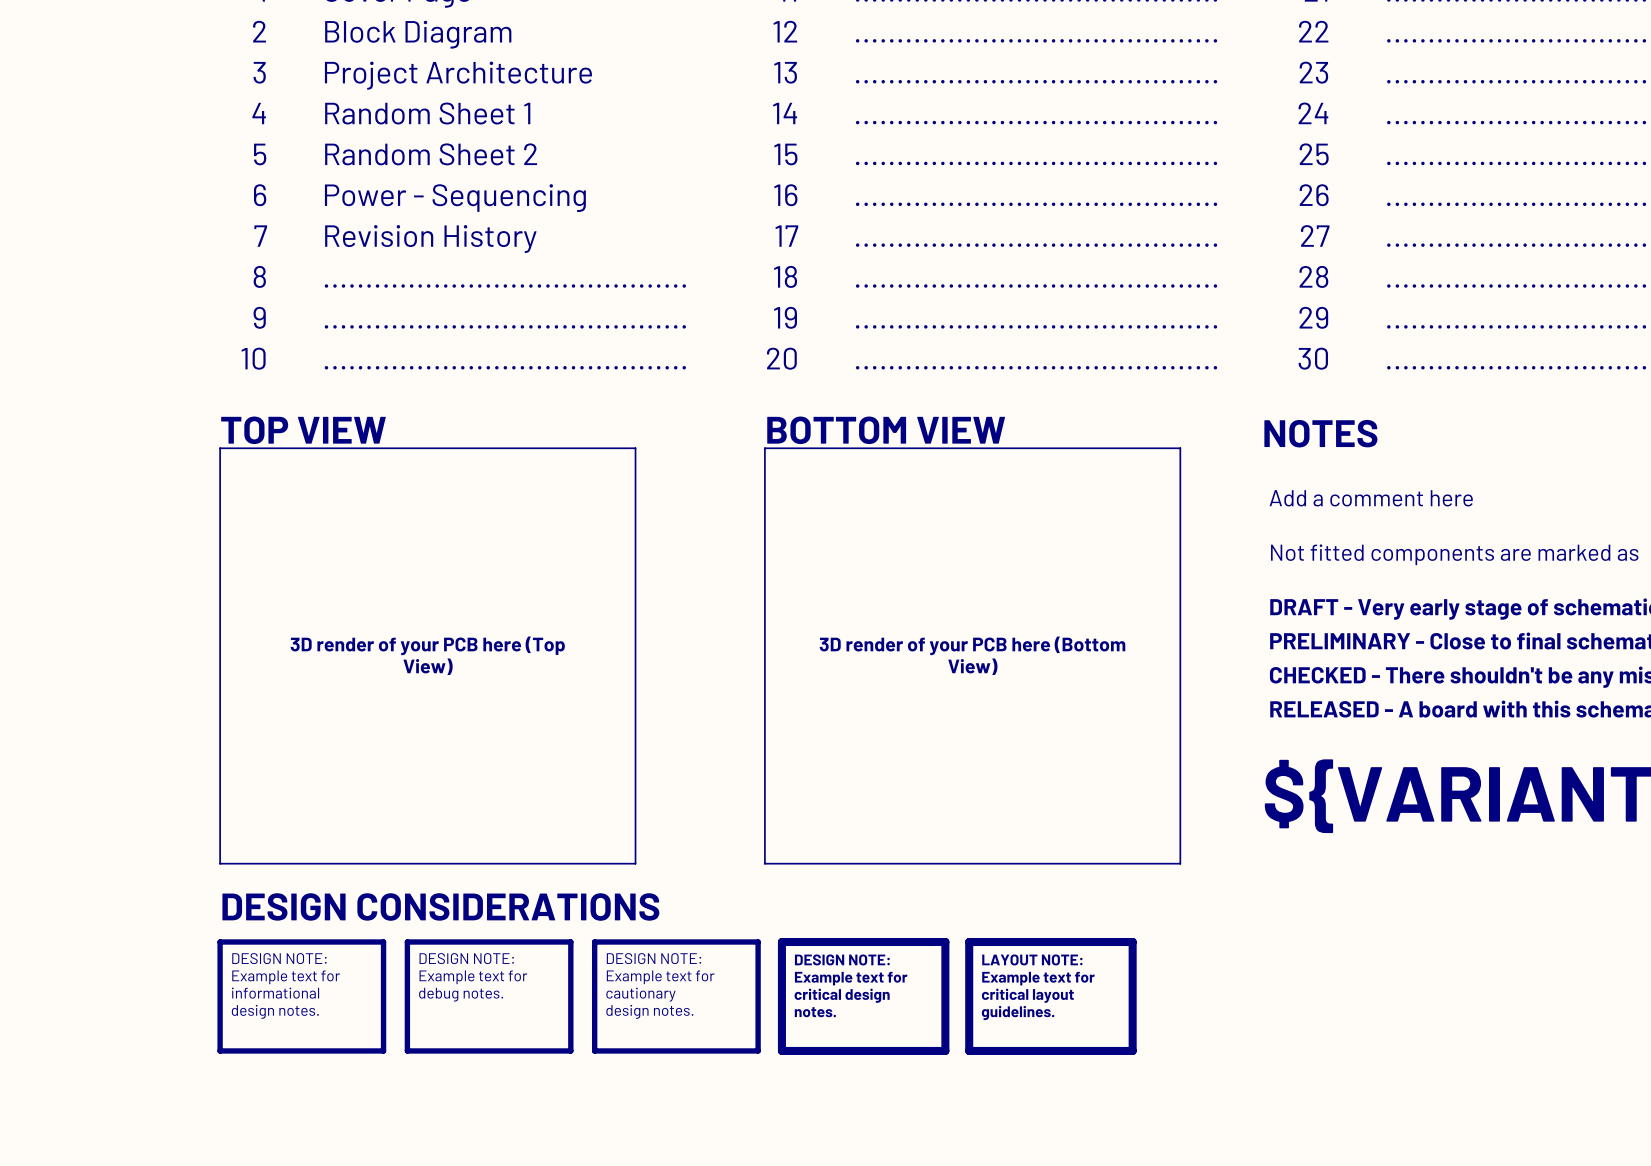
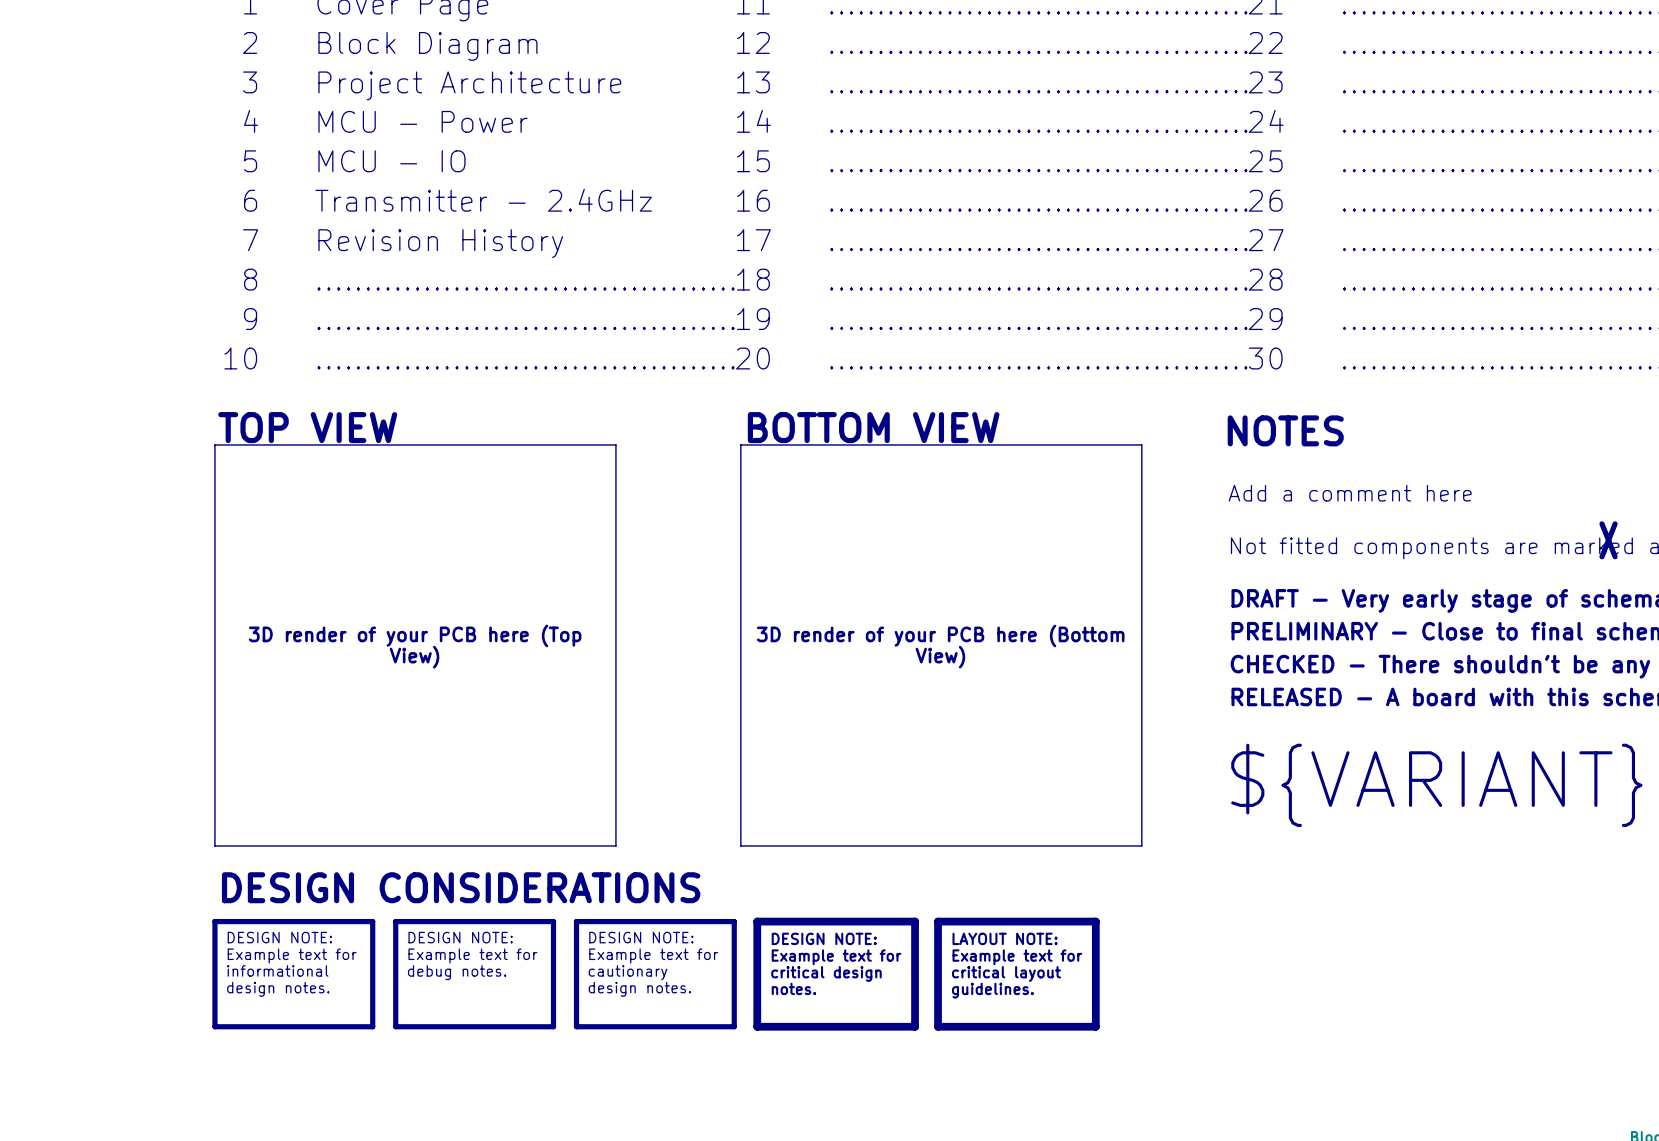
text: Random Sheet 1 (427, 113) -> MCU - Power (423, 121)
text: Random Sheet 2 (431, 154) -> MCU - IO (391, 161)
text: Power - Sequencing (455, 198) -> Transmitter - 2.4GHz (483, 200)

